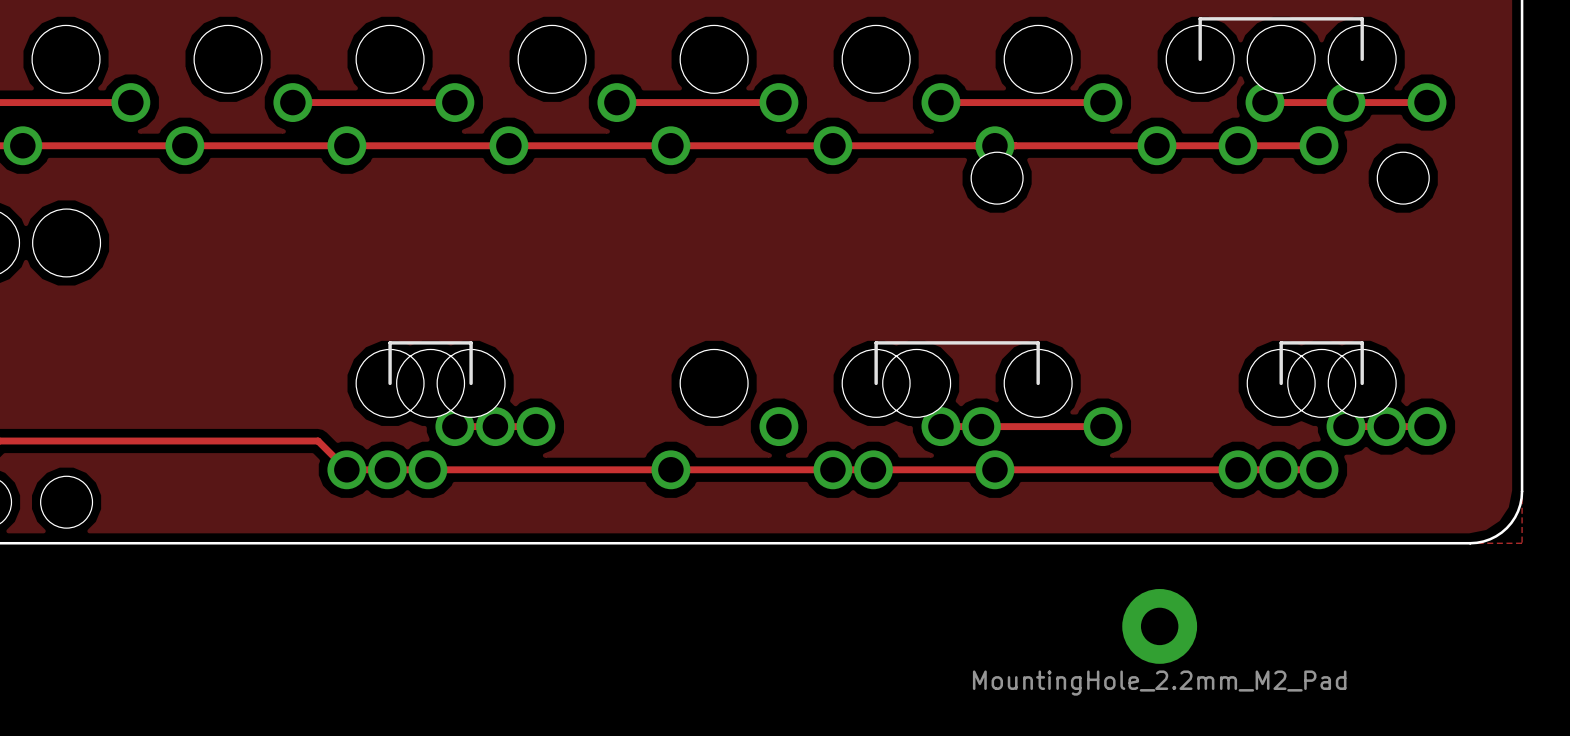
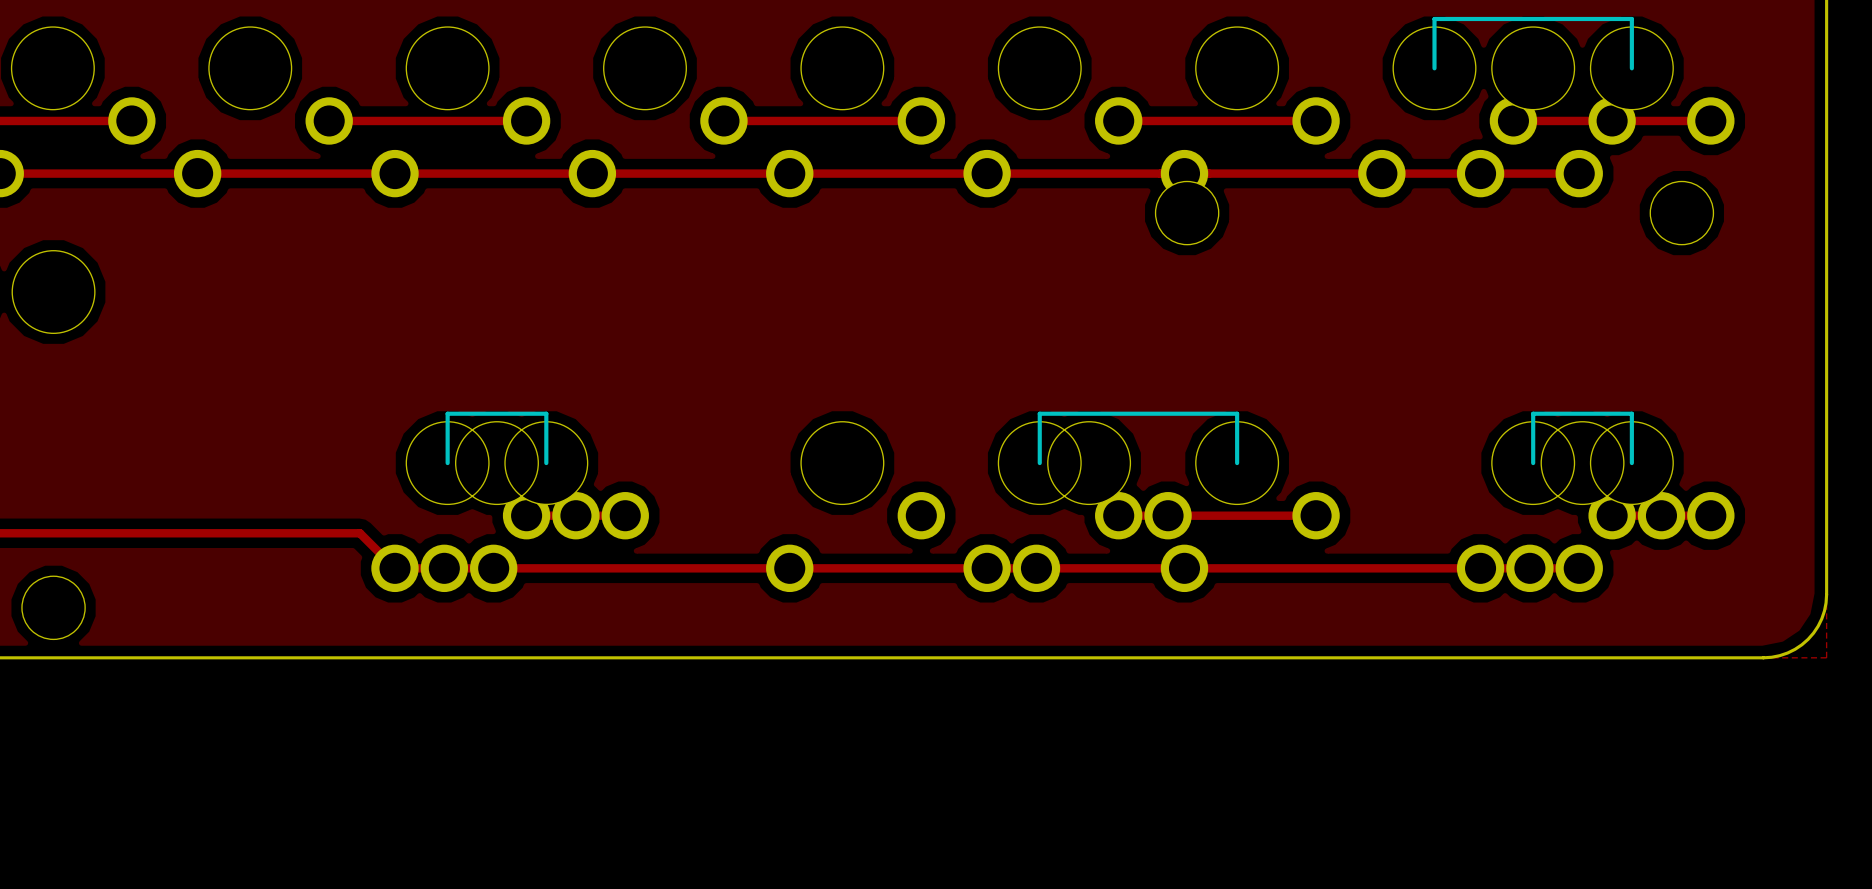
part: MountingHole_2.2mm_M2_Pad (1159, 626) -> none

